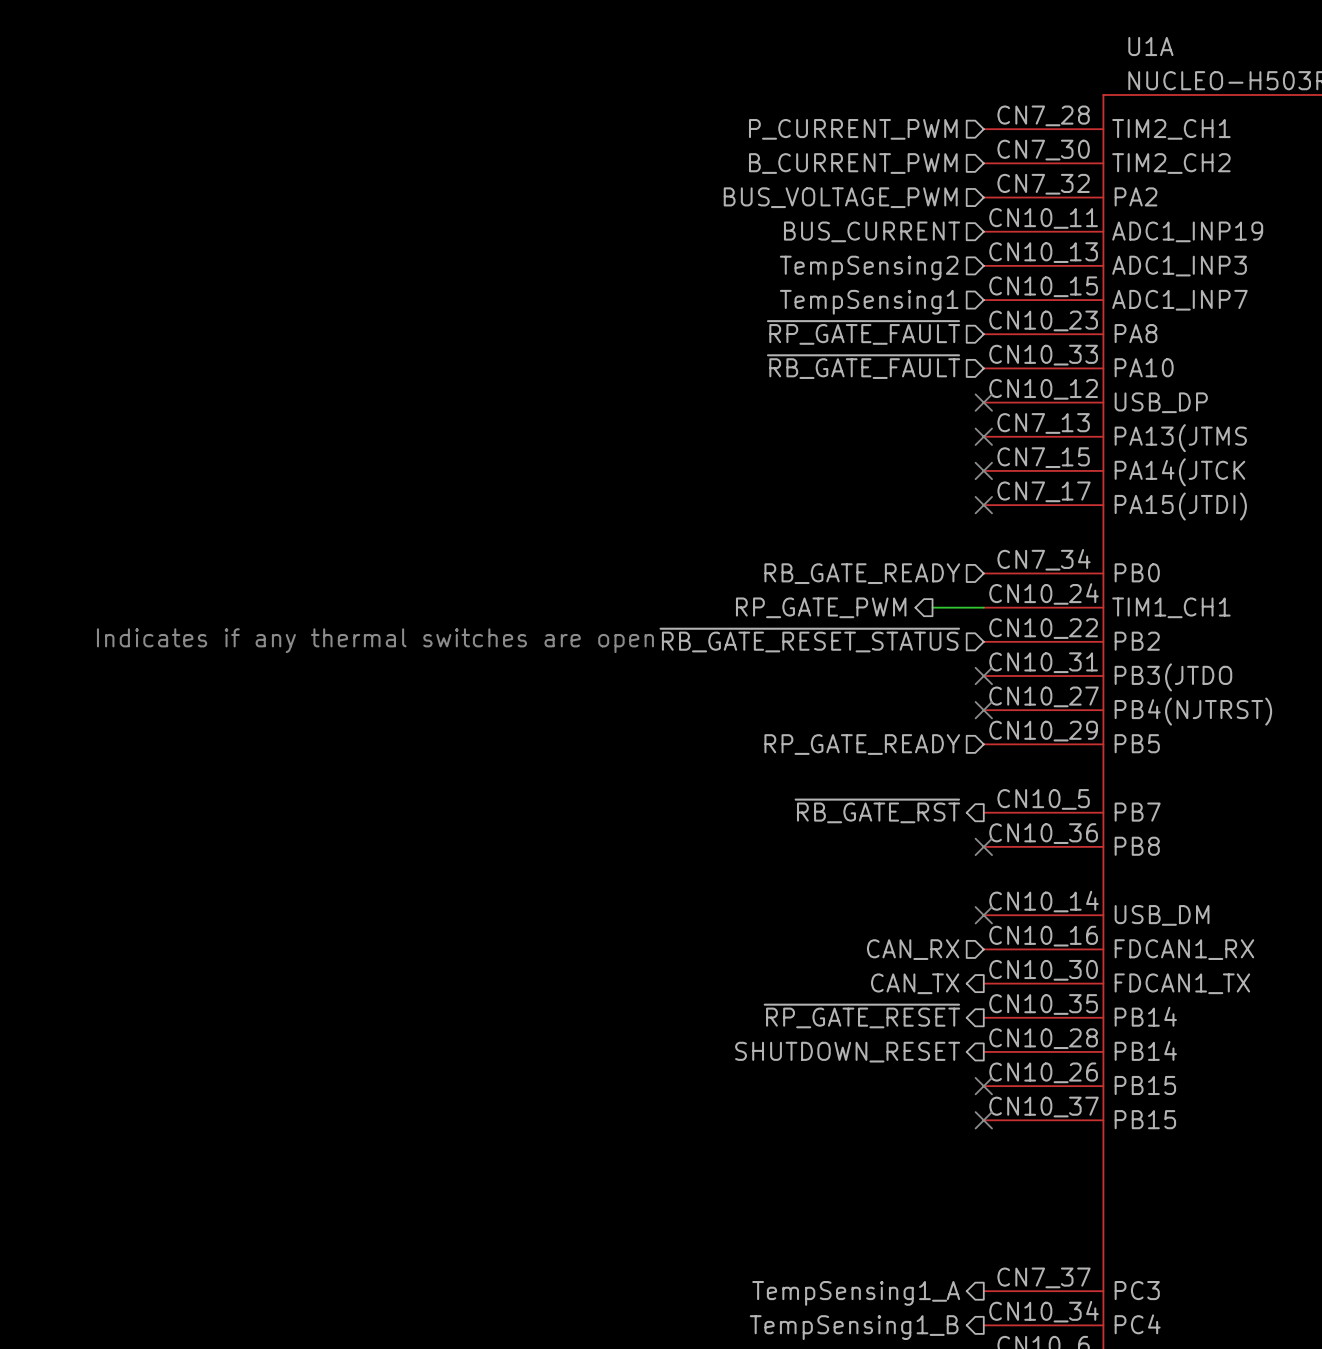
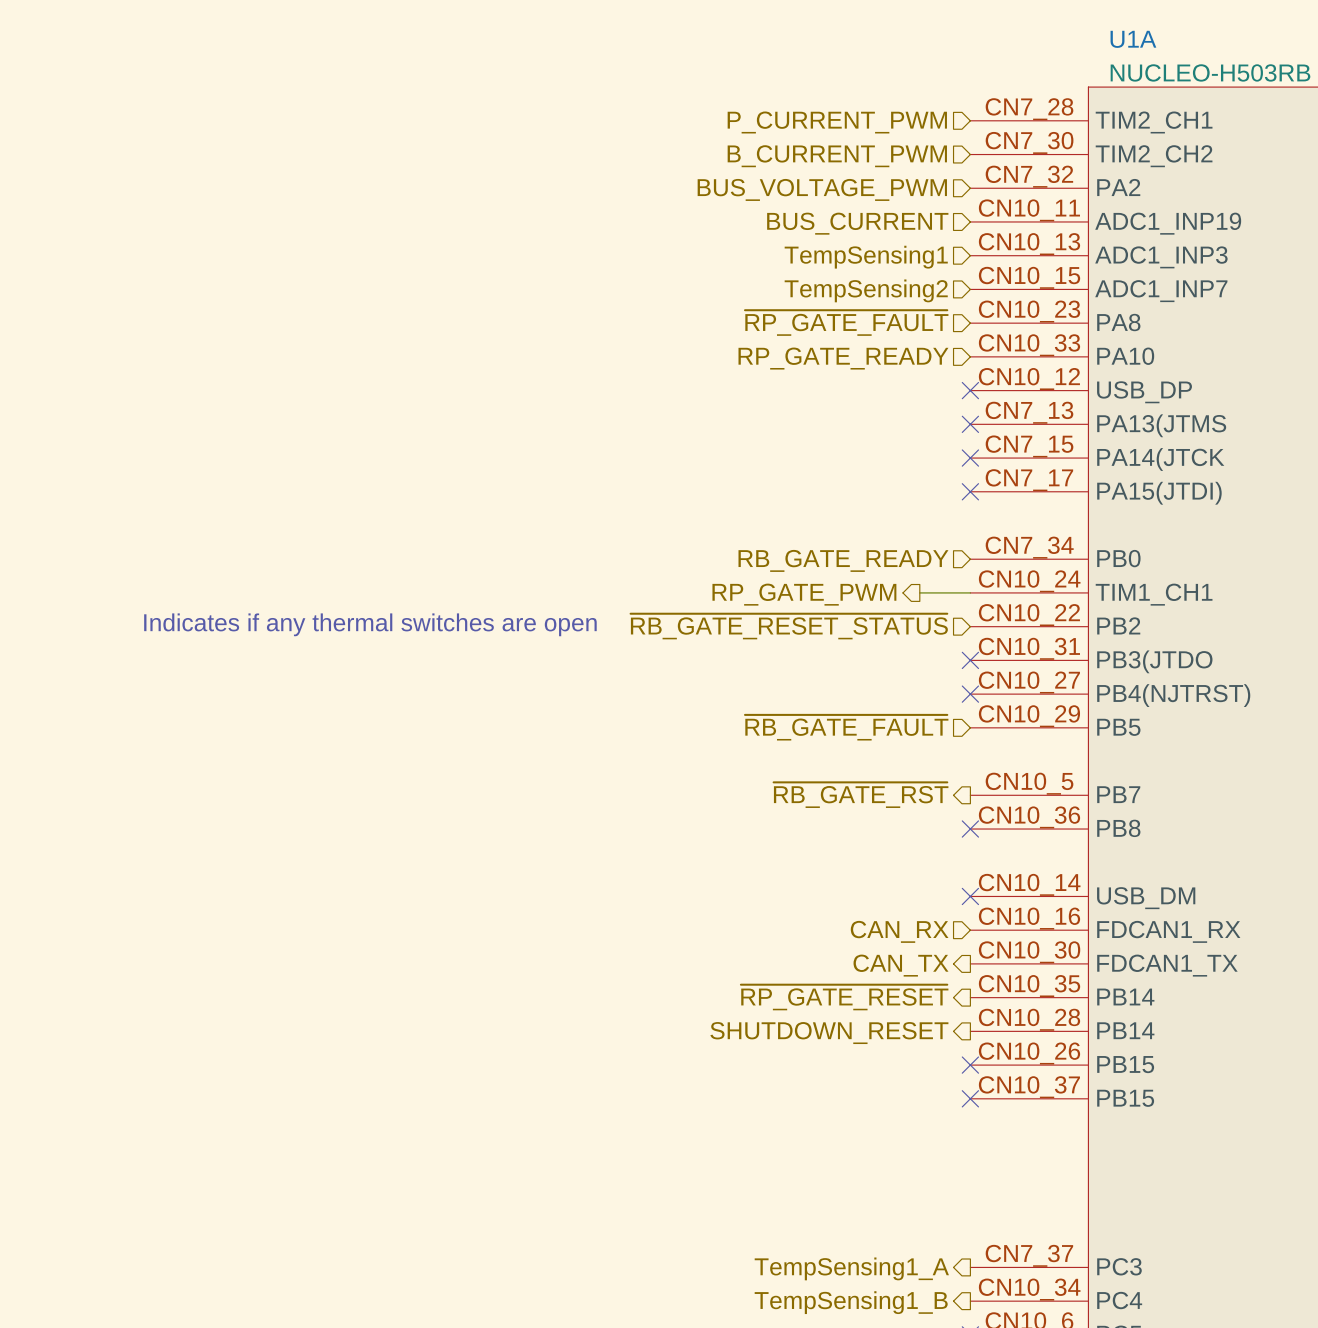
hierarchical label: TempSensing2 (869, 268) -> TempSensing1 (866, 257)
hierarchical label: TempSensing1 (869, 302) -> TempSensing2 (866, 290)
hierarchical label: ~{RB_GATE_FAULT} (863, 366) -> RP_GATE_READY (843, 358)
hierarchical label: RP_GATE_READY (862, 744) -> ~{RB_GATE_FAULT} (846, 727)

